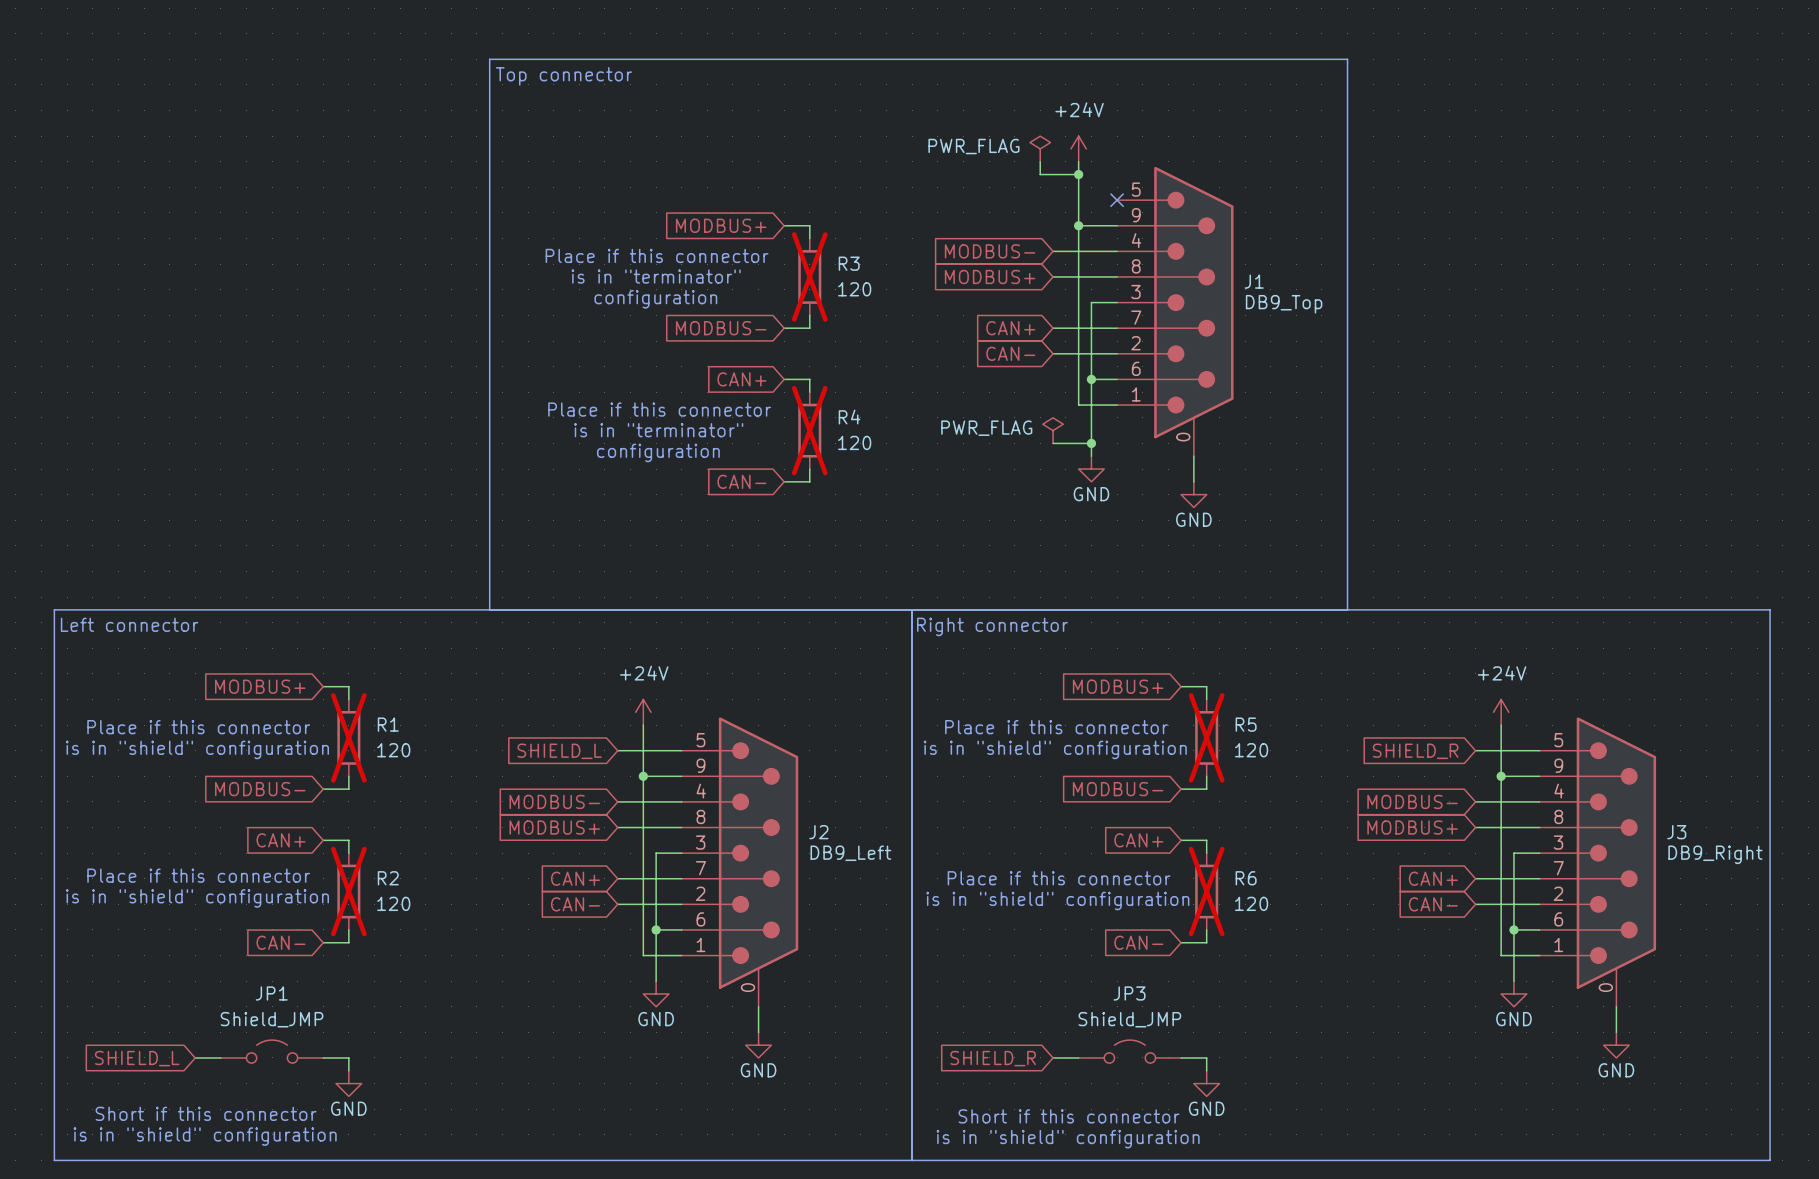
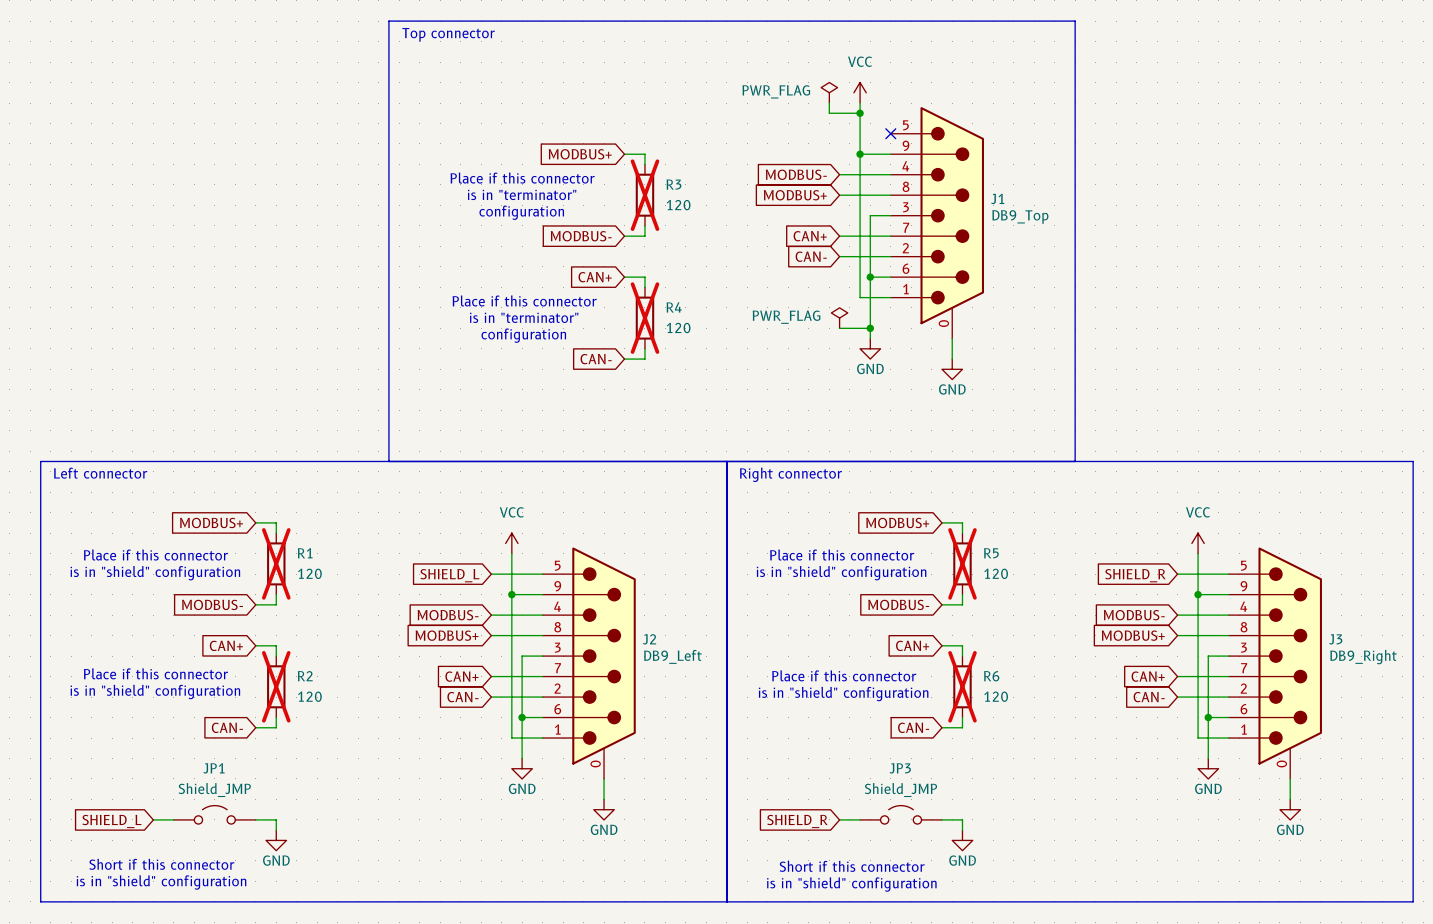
power symbol: +24V (1078, 148) -> VCC (860, 92)
power symbol: +24V (643, 712) -> VCC (511, 543)
power symbol: +24V (1501, 712) -> VCC (1198, 543)

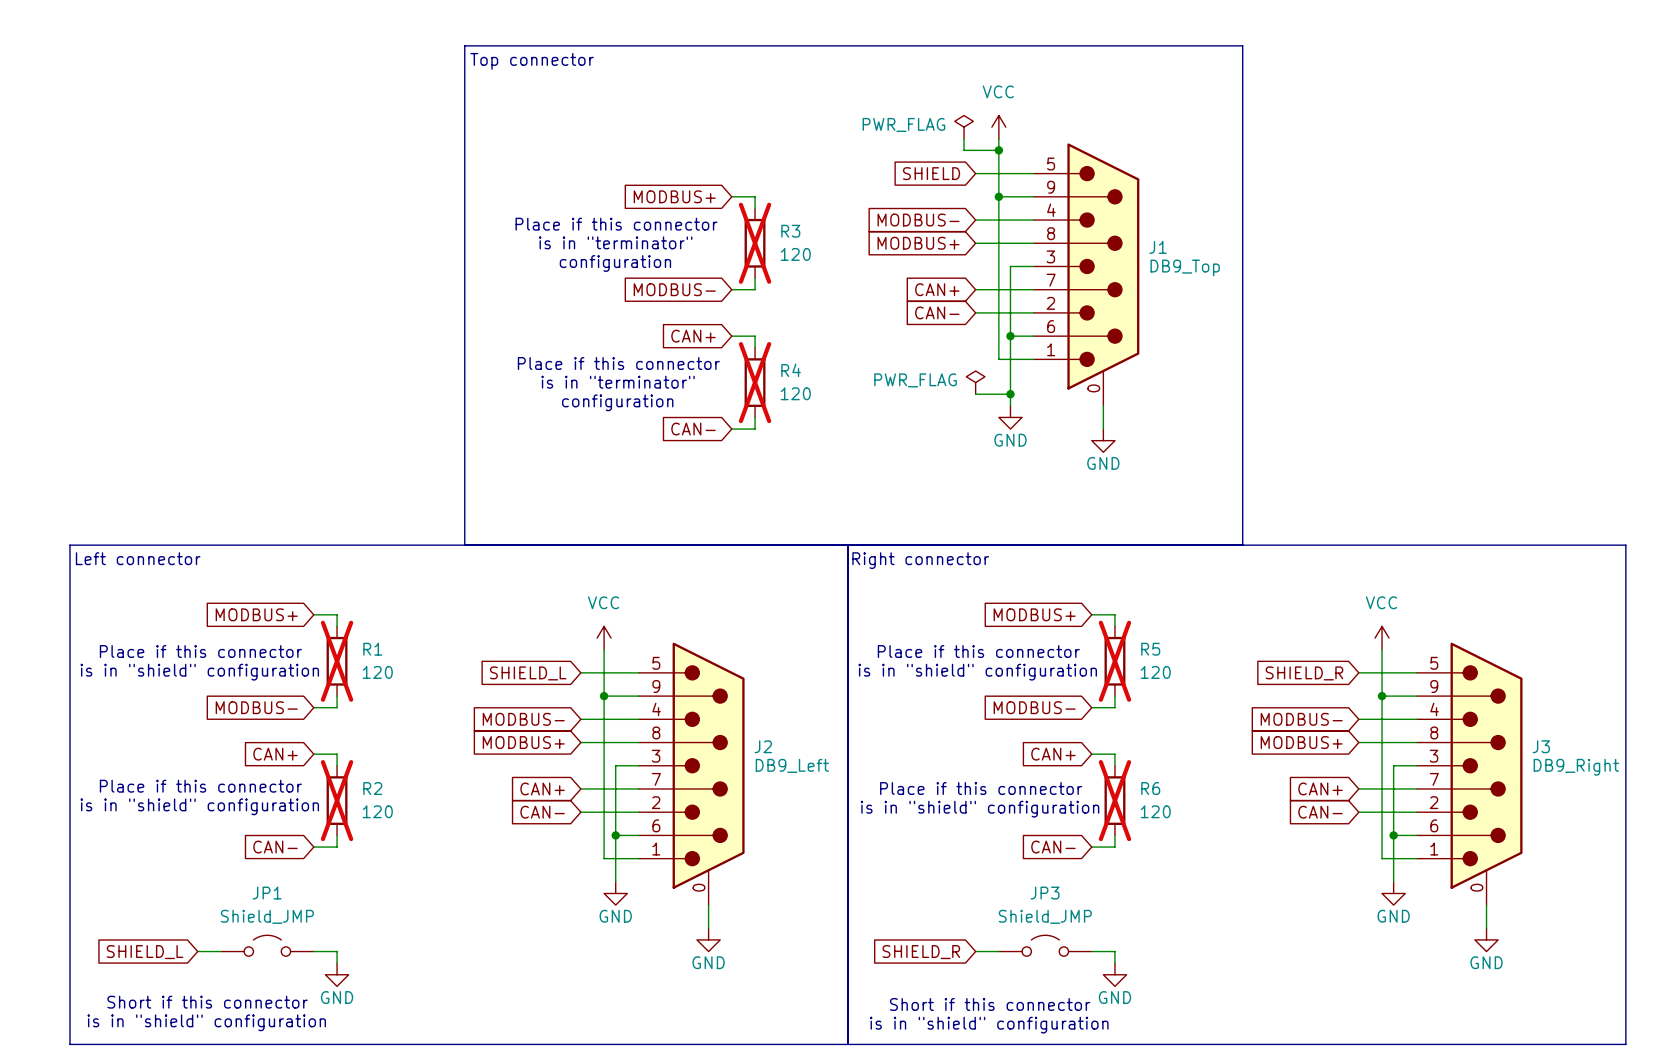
global label: none -> SHIELD (931, 173)
wire: none -> (975, 173) (1033, 173)
no-connect mark: (890, 133) -> none

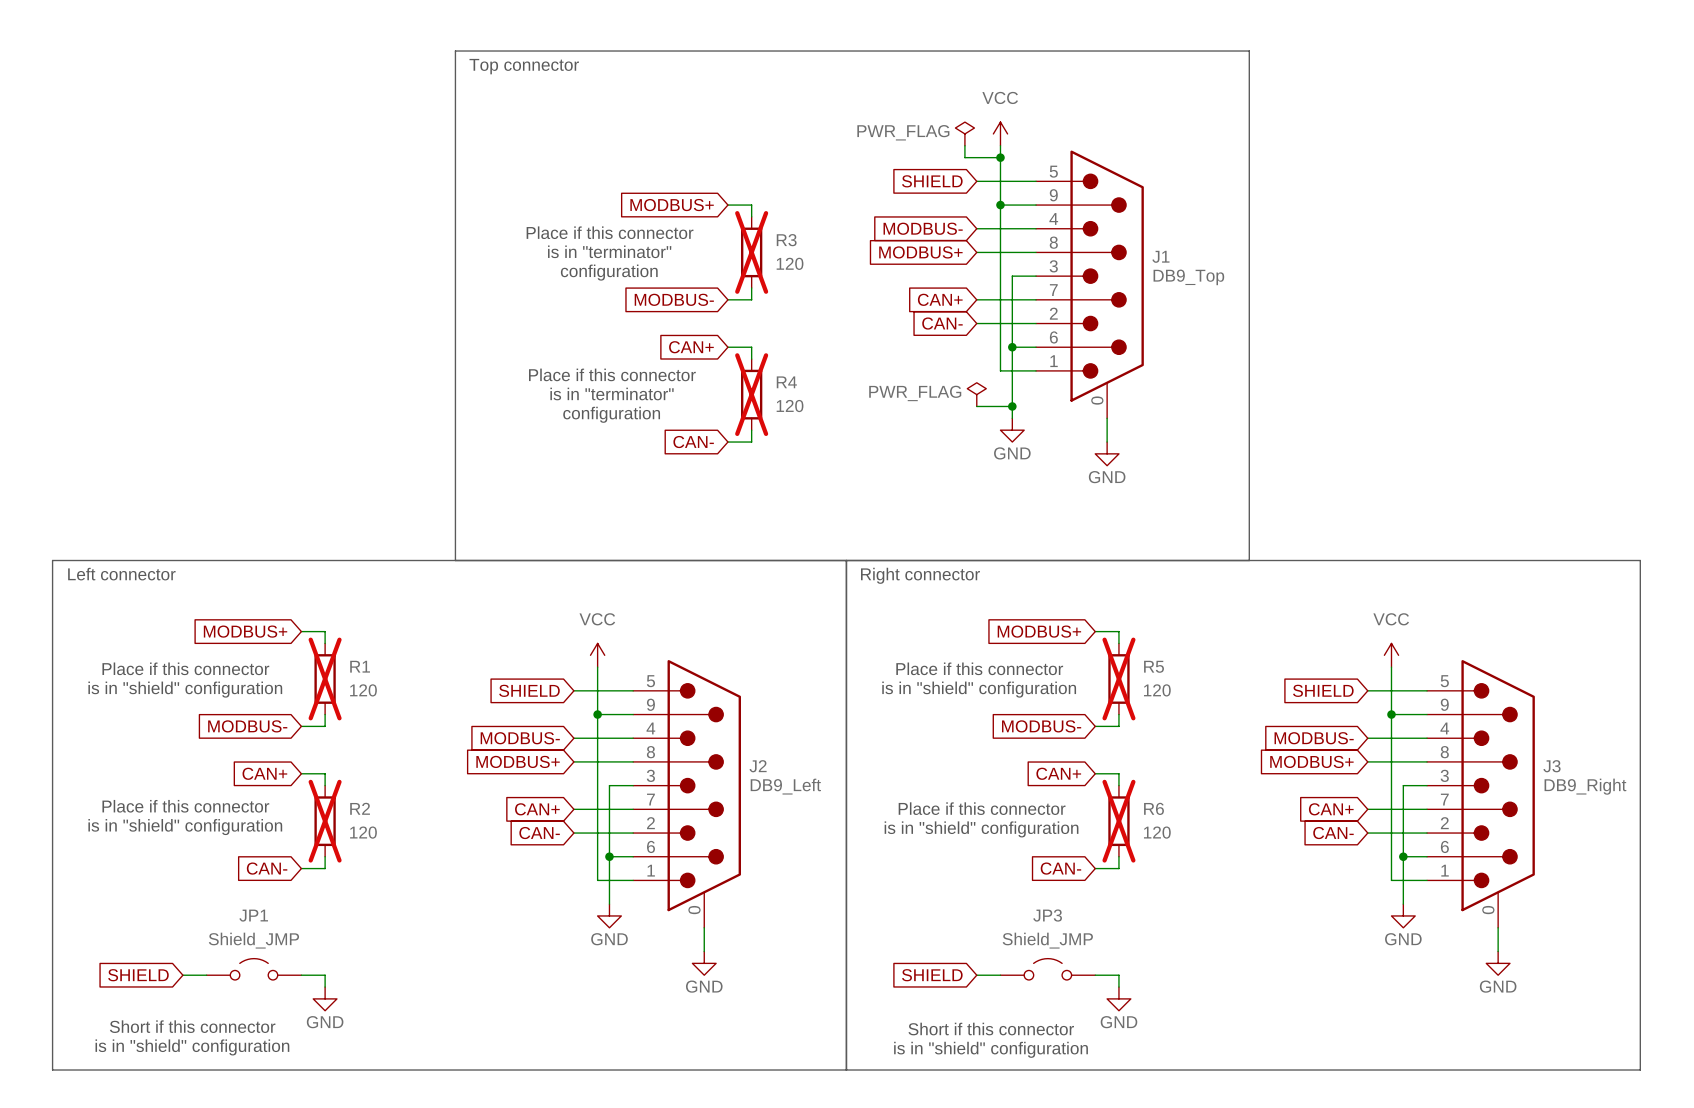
global label: SHIELD_L (528, 673) -> SHIELD (529, 690)
global label: SHIELD_R (1304, 673) -> SHIELD (1323, 690)
global label: SHIELD_L (145, 952) -> SHIELD (138, 975)
global label: SHIELD_R (921, 952) -> SHIELD (932, 975)

